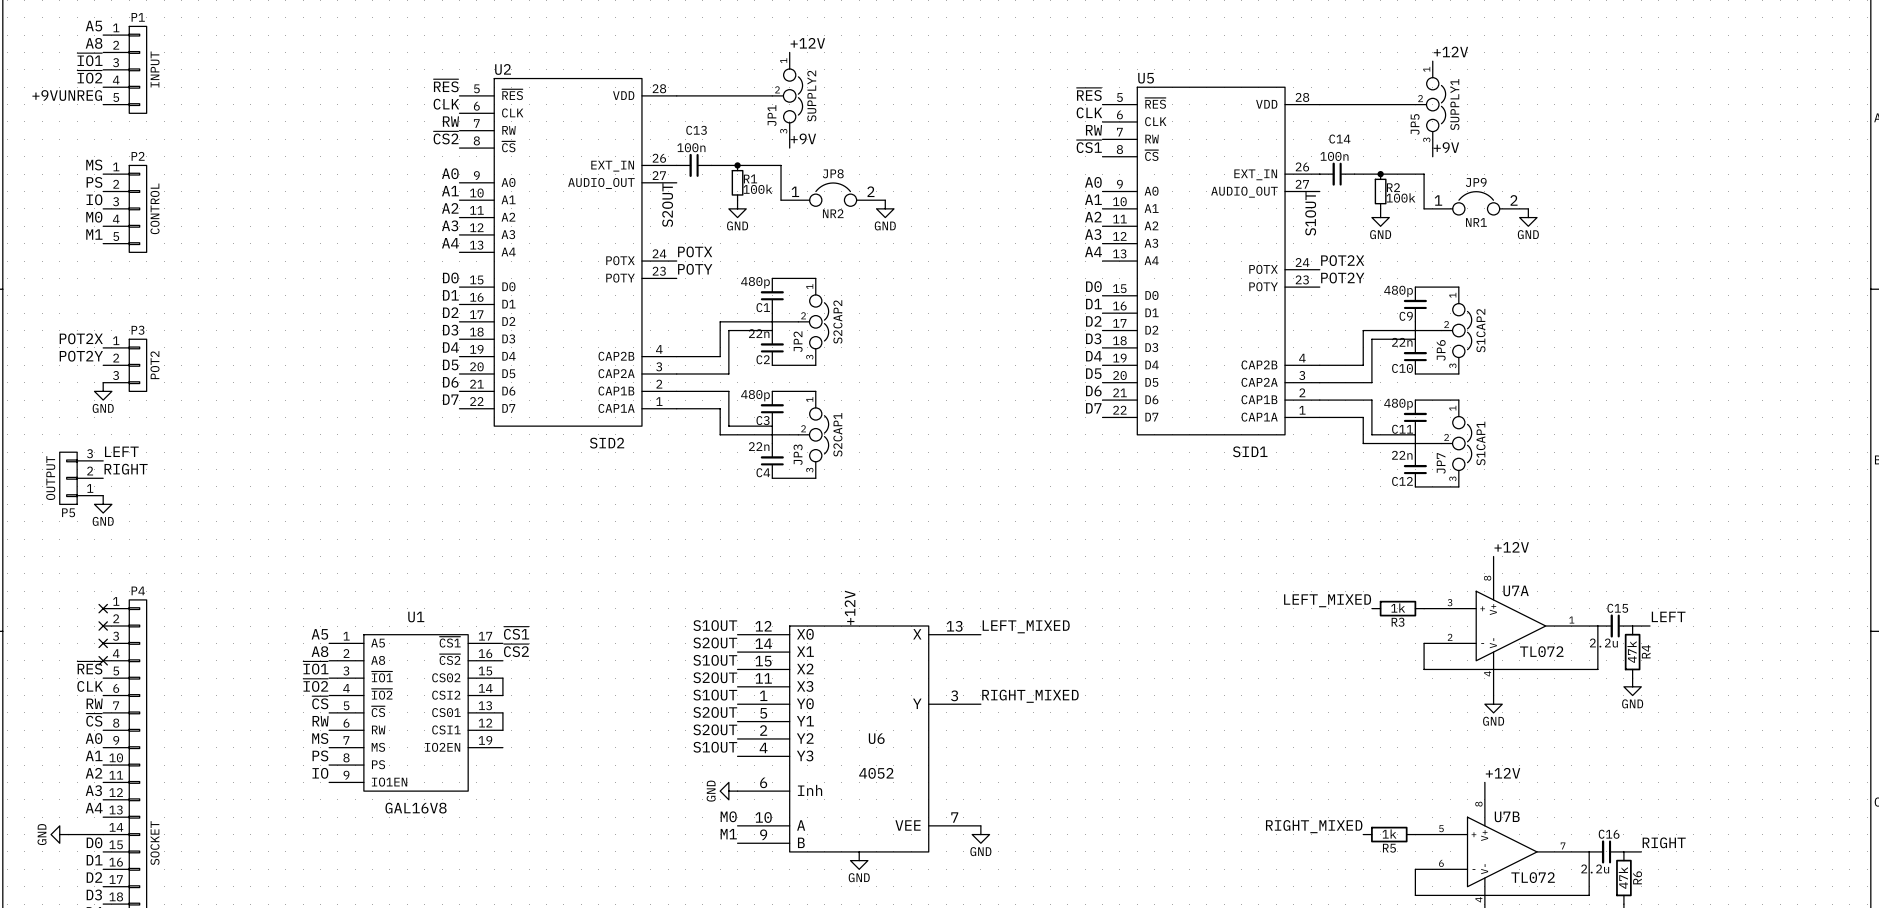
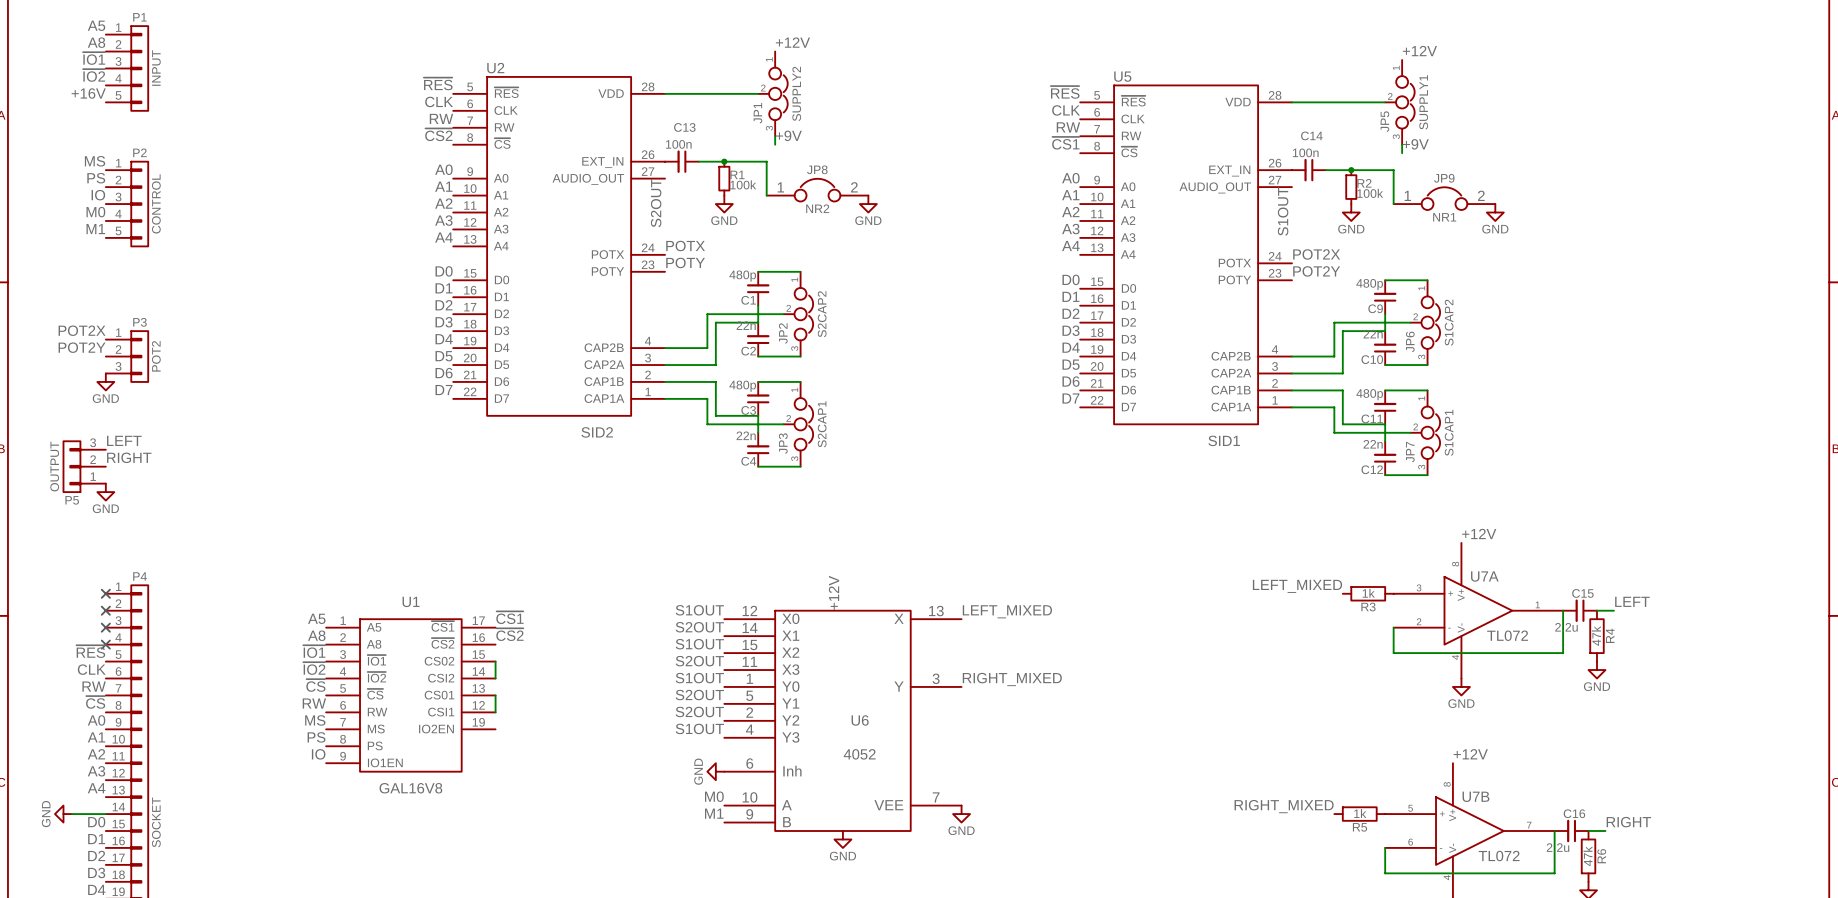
label: +9VUNREG (67, 95) -> +16V (88, 93)

